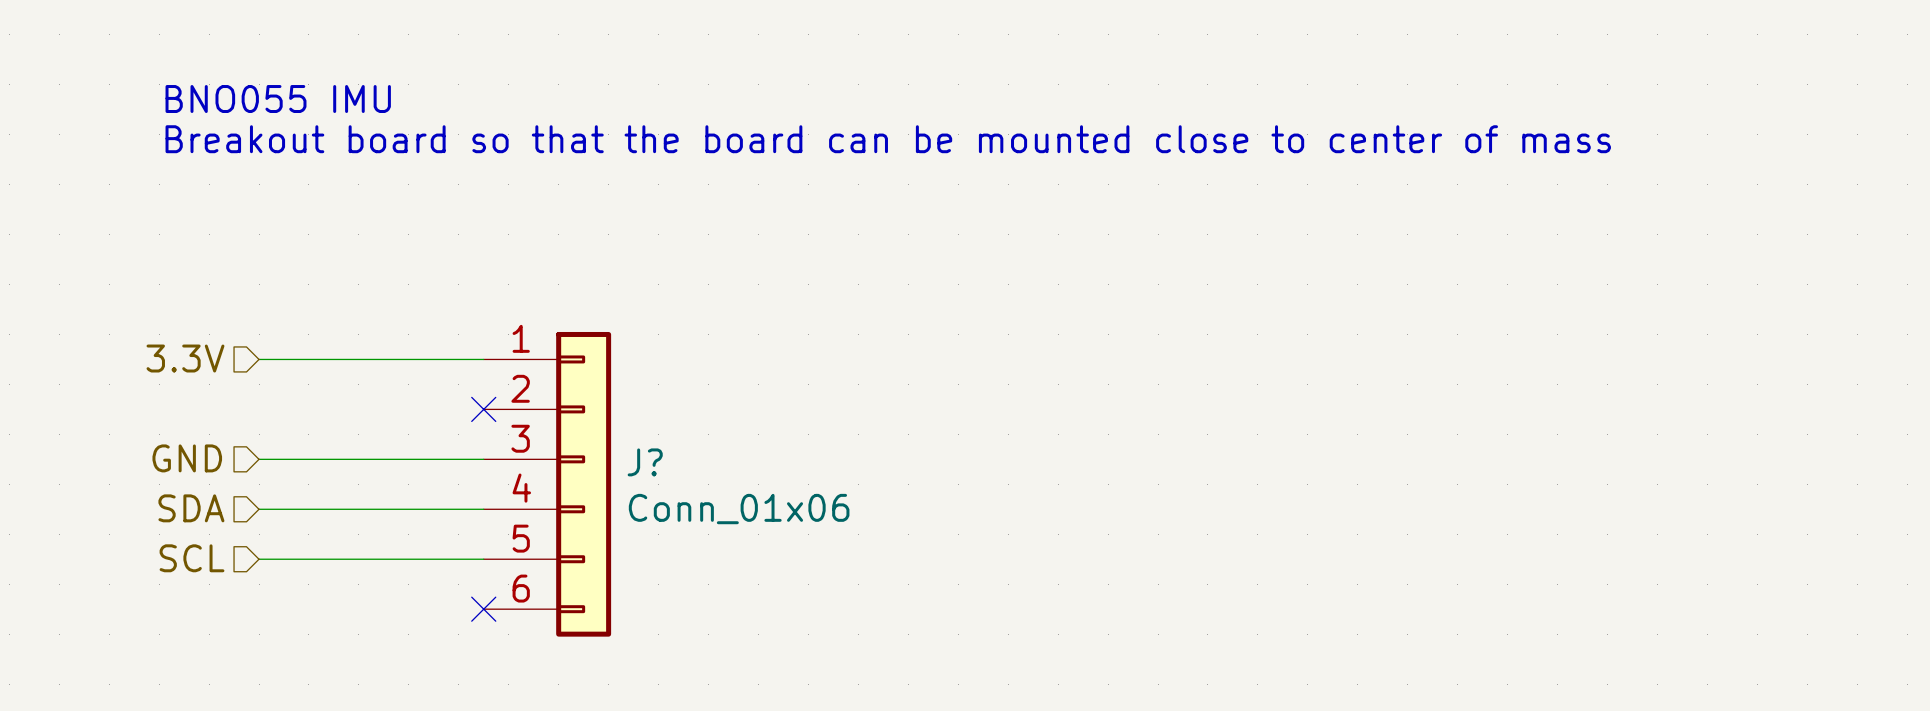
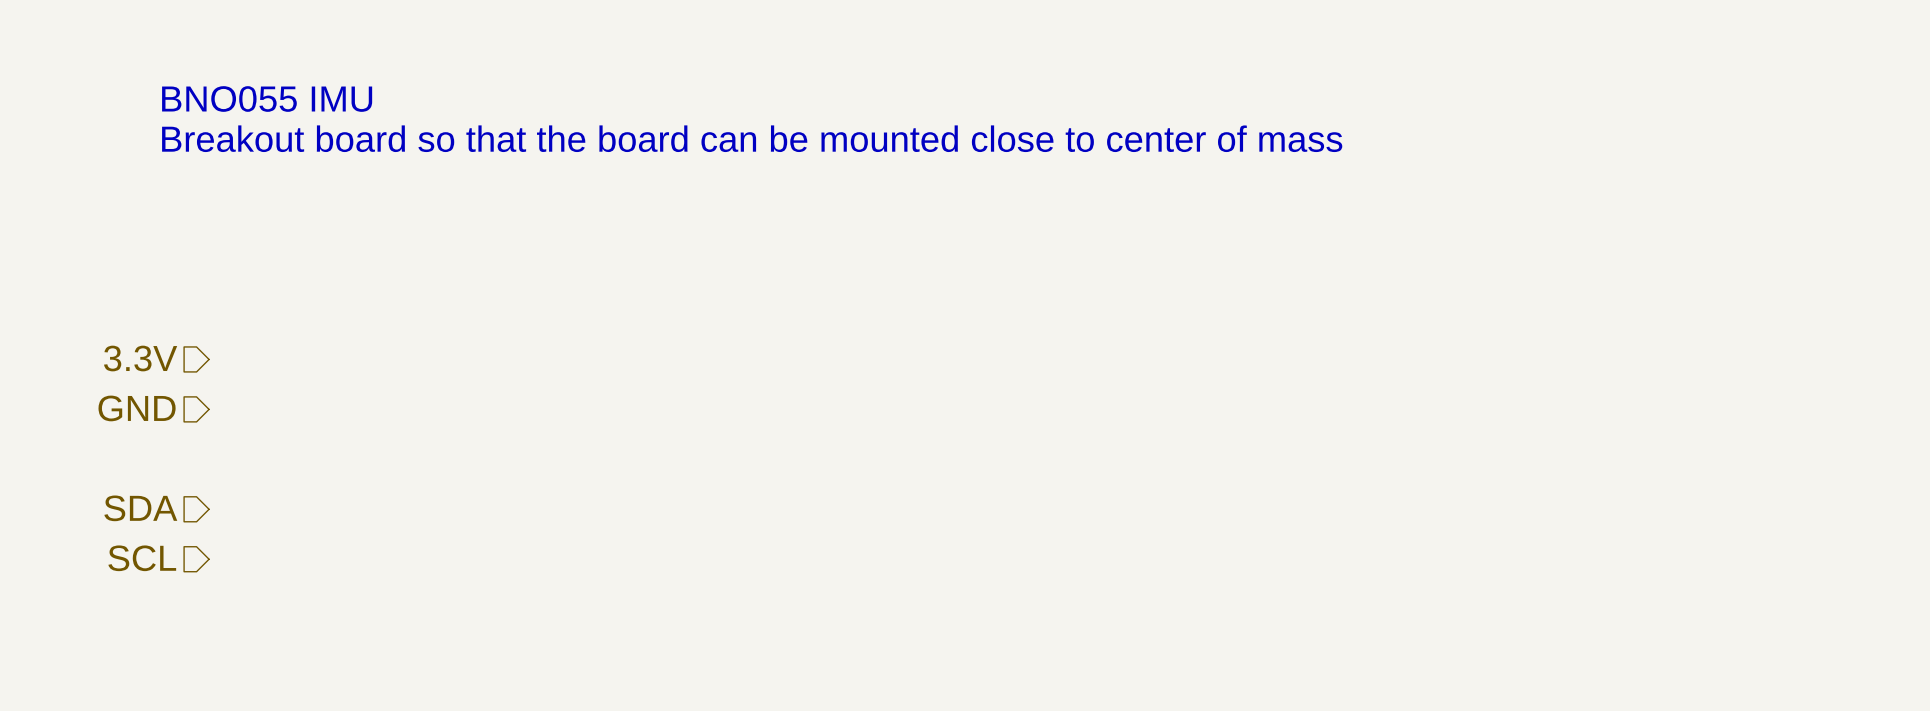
hierarchical label position: 3.3V (185, 358) -> 3.3V (140, 358)
wire: (259, 359) (483, 359) -> none
no-connect mark: (483, 409) -> none
hierarchical label position: GND (187, 458) -> GND (137, 408)
wire: (259, 459) (483, 459) -> none
J?: Conn_01x06 (547, 484) -> none
hierarchical label position: SDA (191, 508) -> SDA (140, 508)
wire: (259, 509) (483, 509) -> none
hierarchical label position: SCL (192, 558) -> SCL (142, 558)
wire: (259, 559) (483, 559) -> none
no-connect mark: (483, 609) -> none

